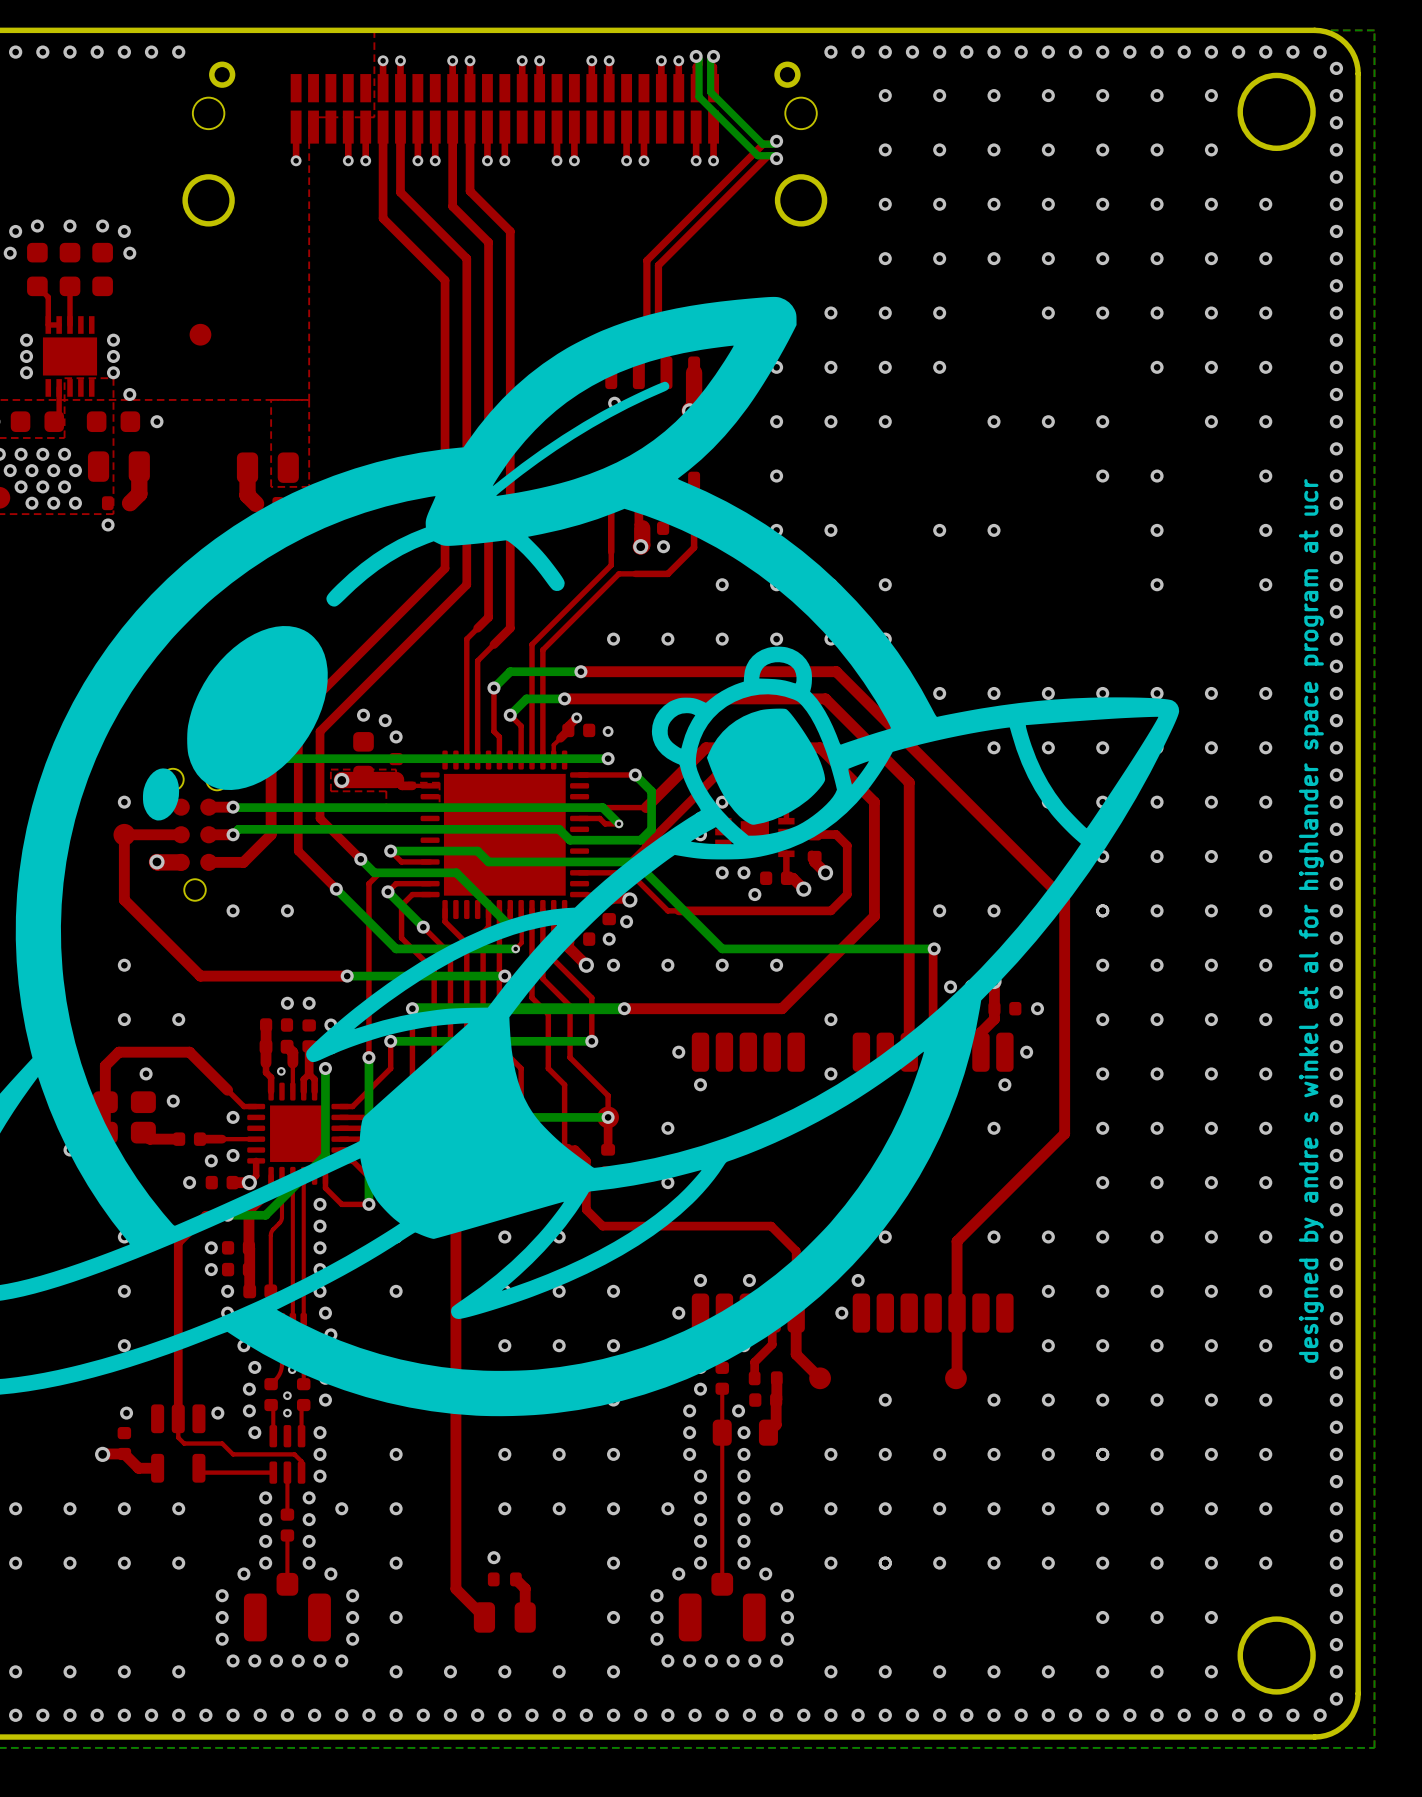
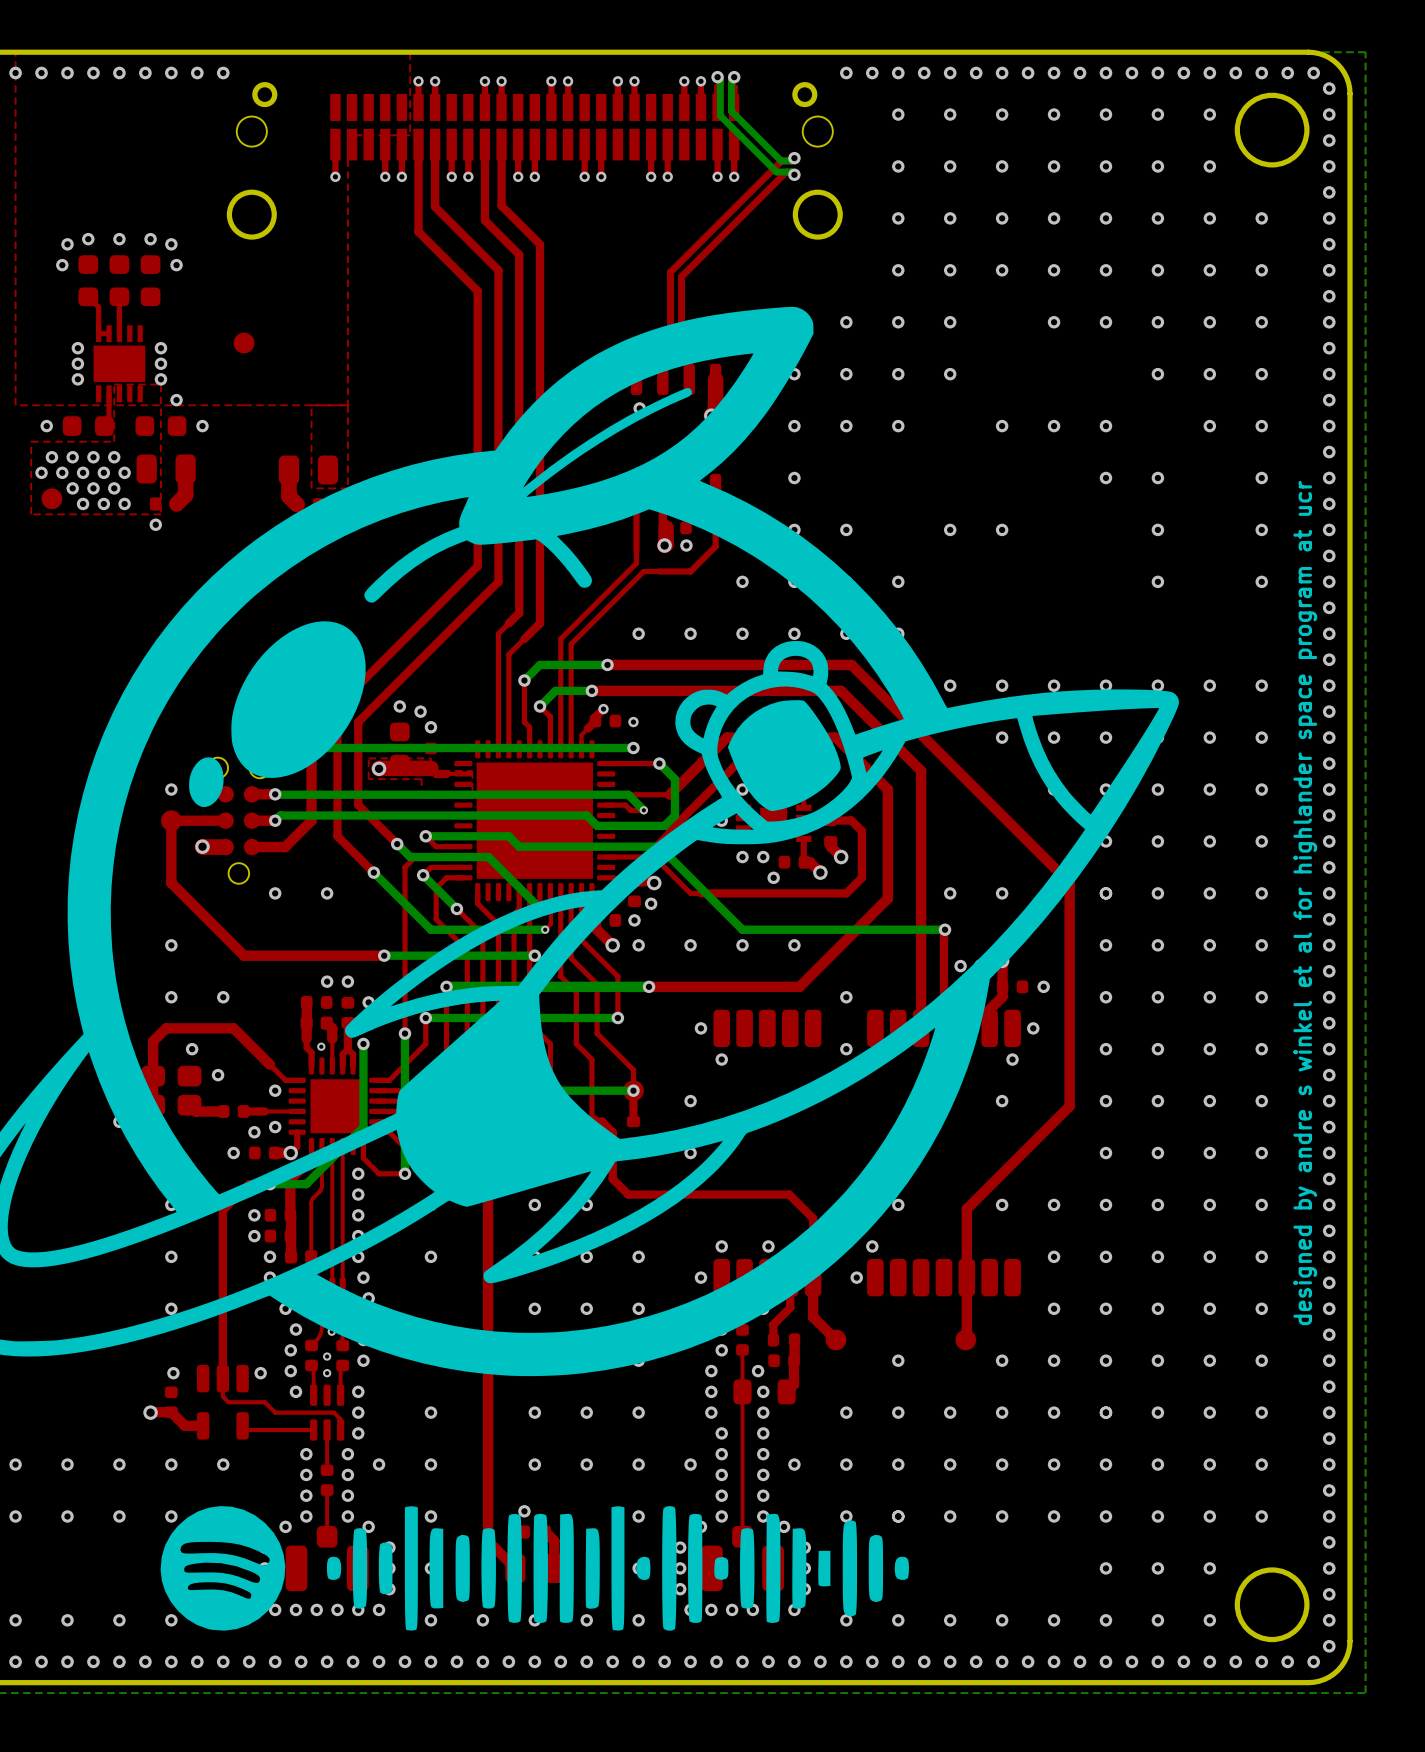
drawing: none -> [160, 1506, 910, 1631]

